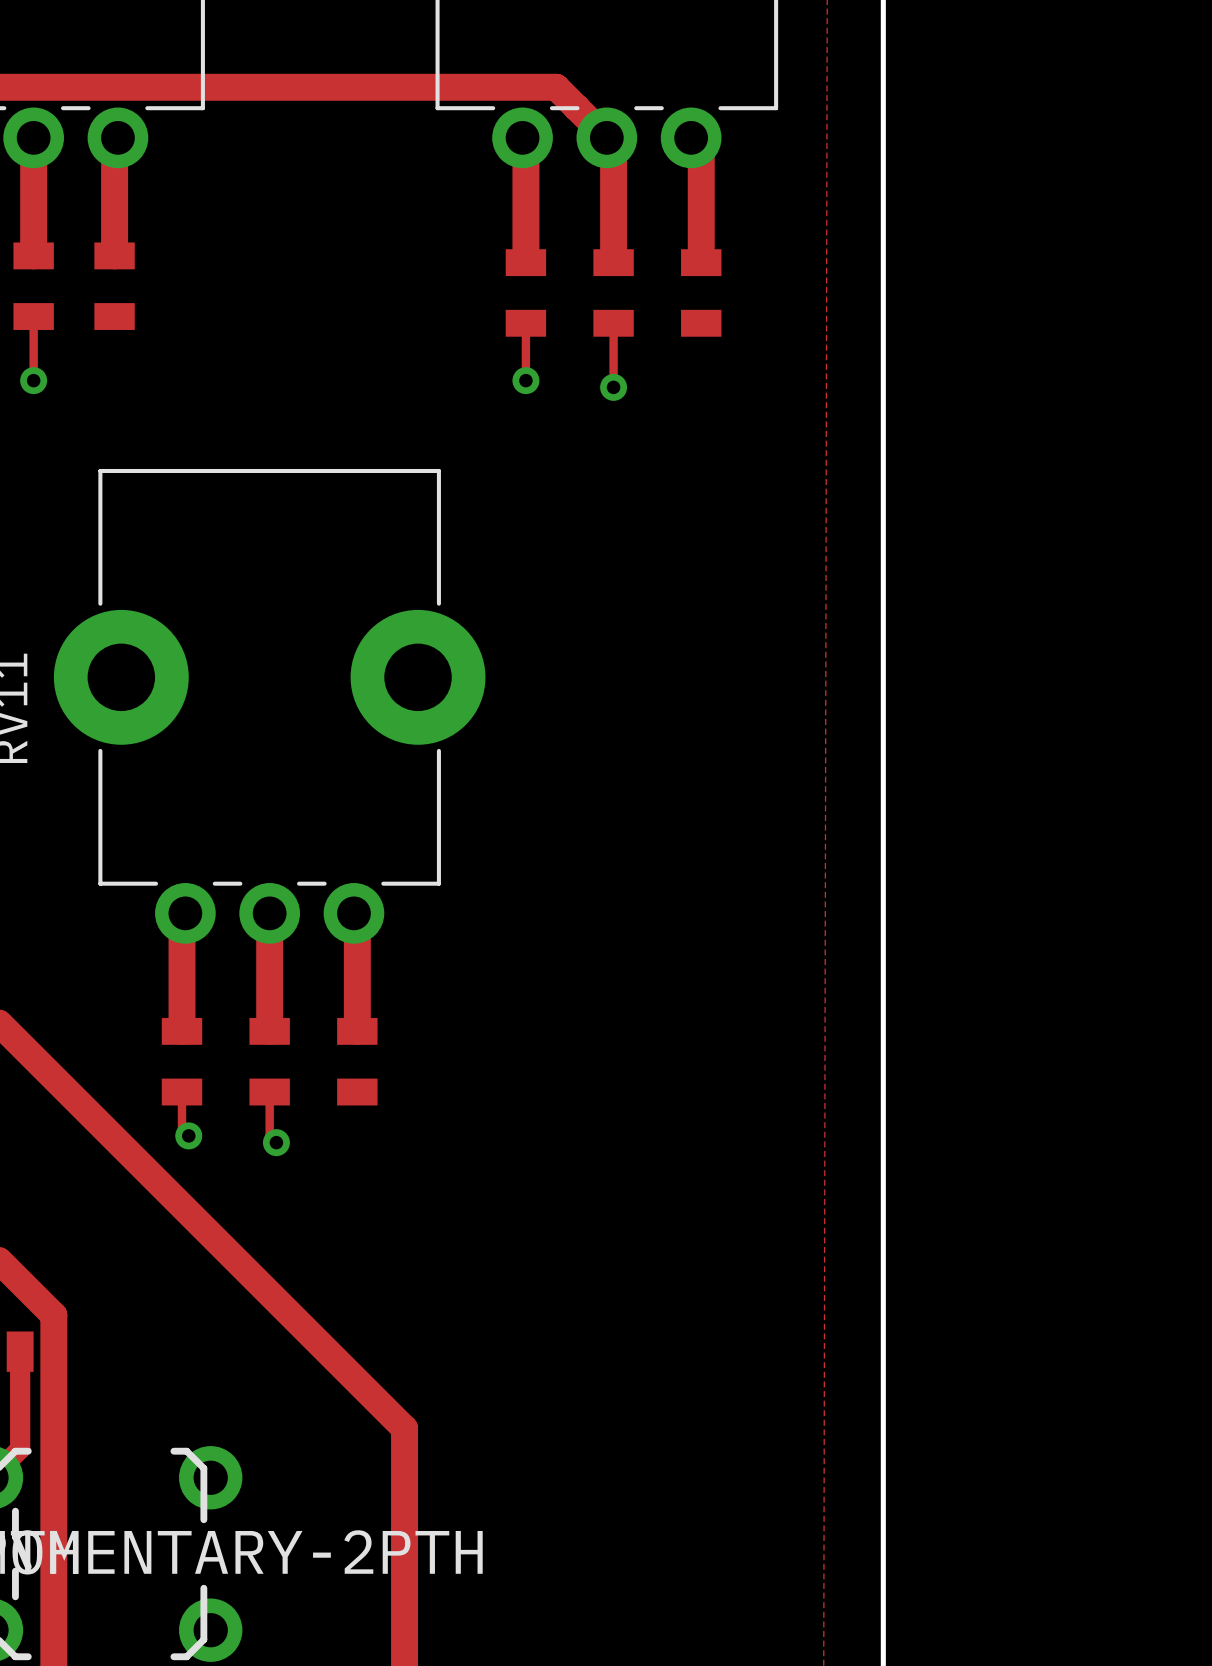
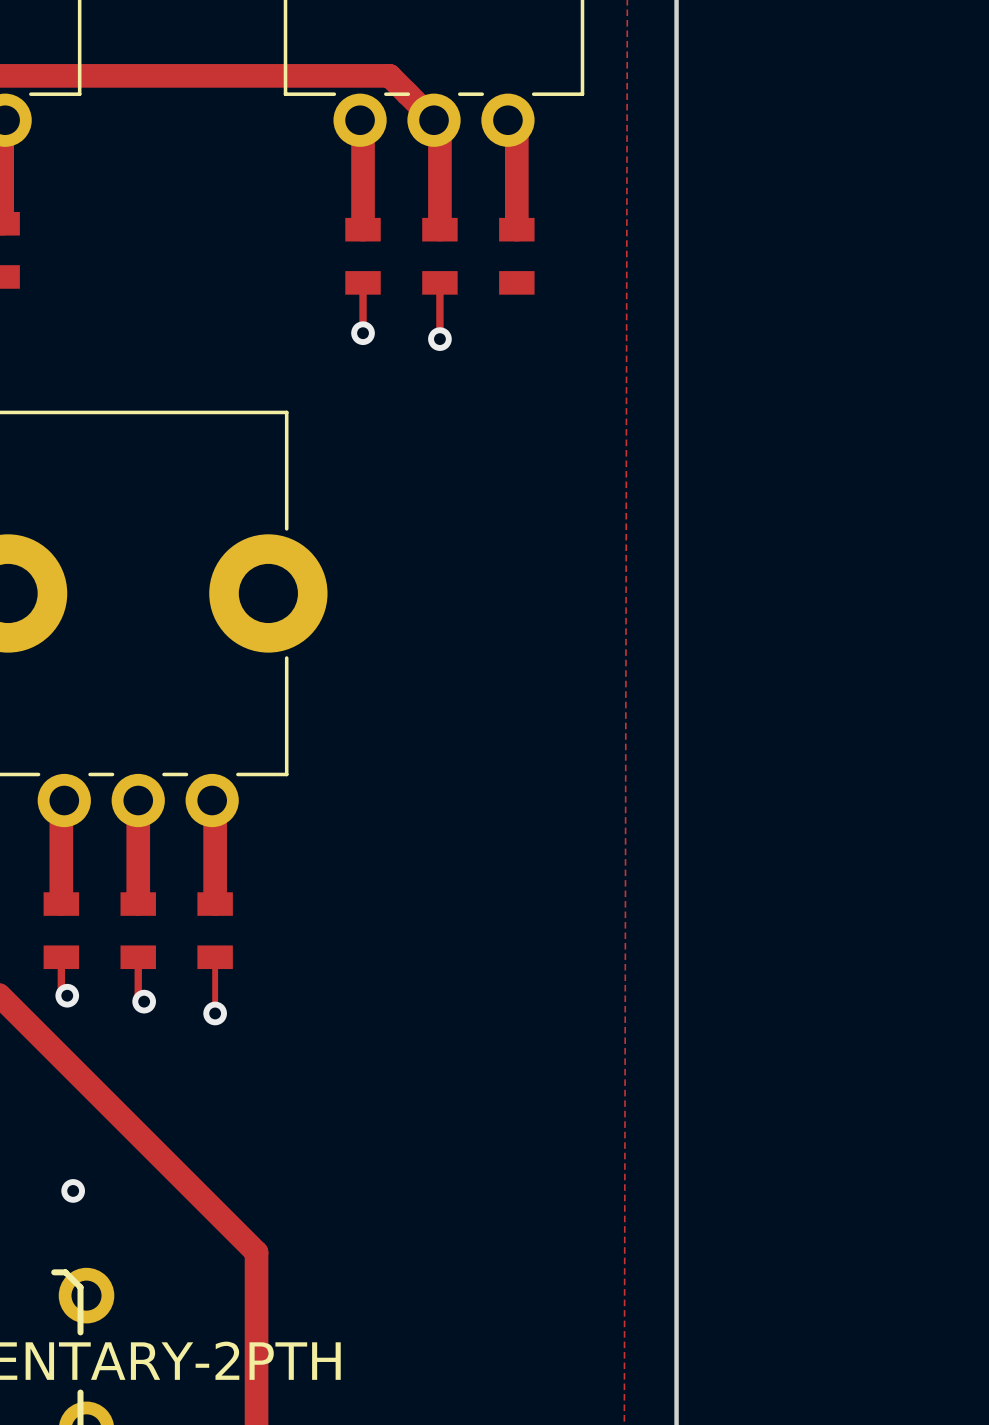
track: none -> (215, 957) (215, 1013)
via: none -> (215, 1013)
via: none -> (73, 1190)

